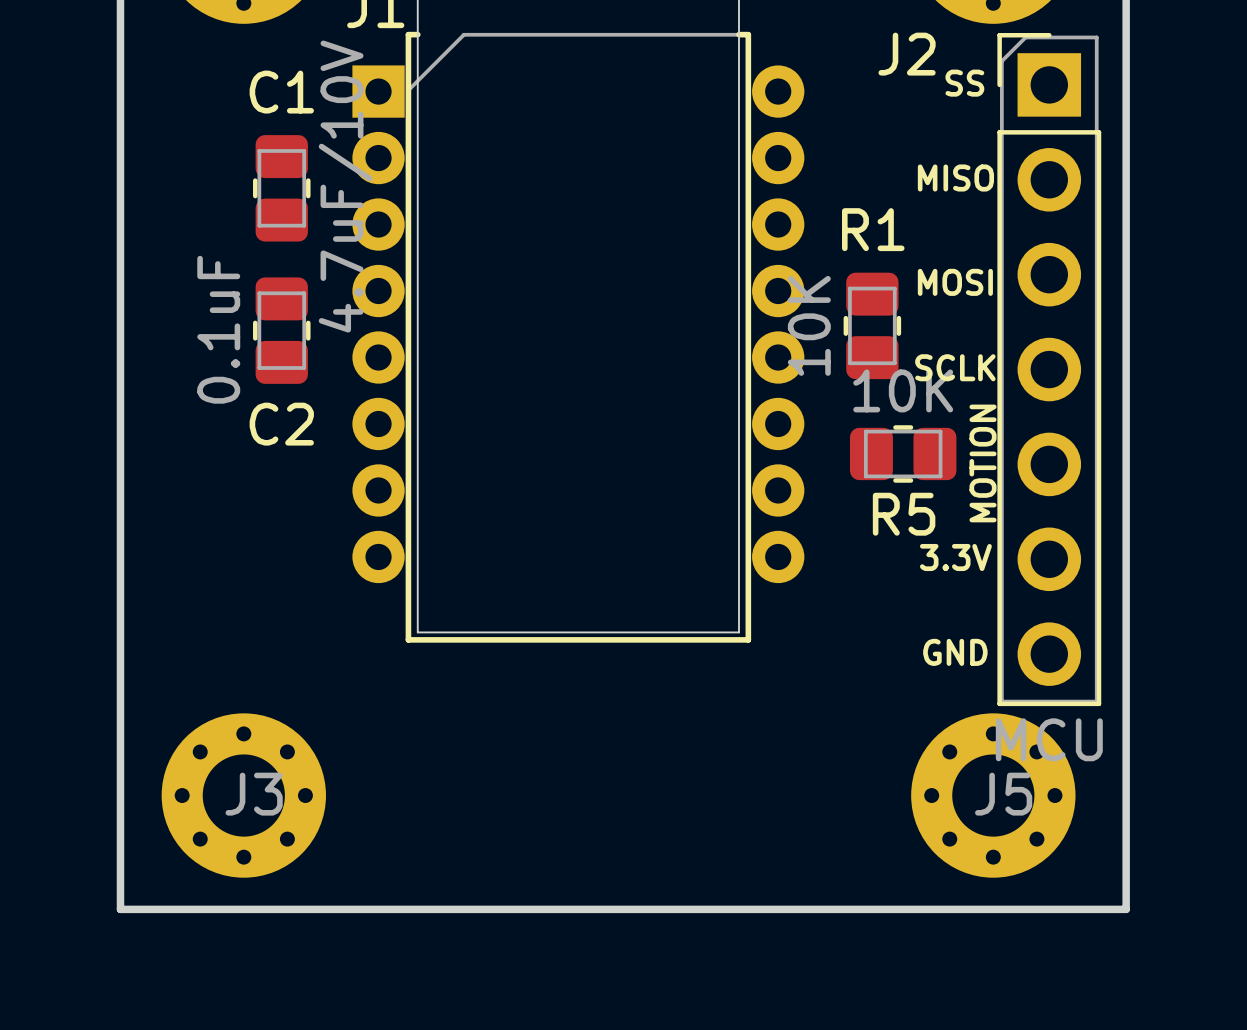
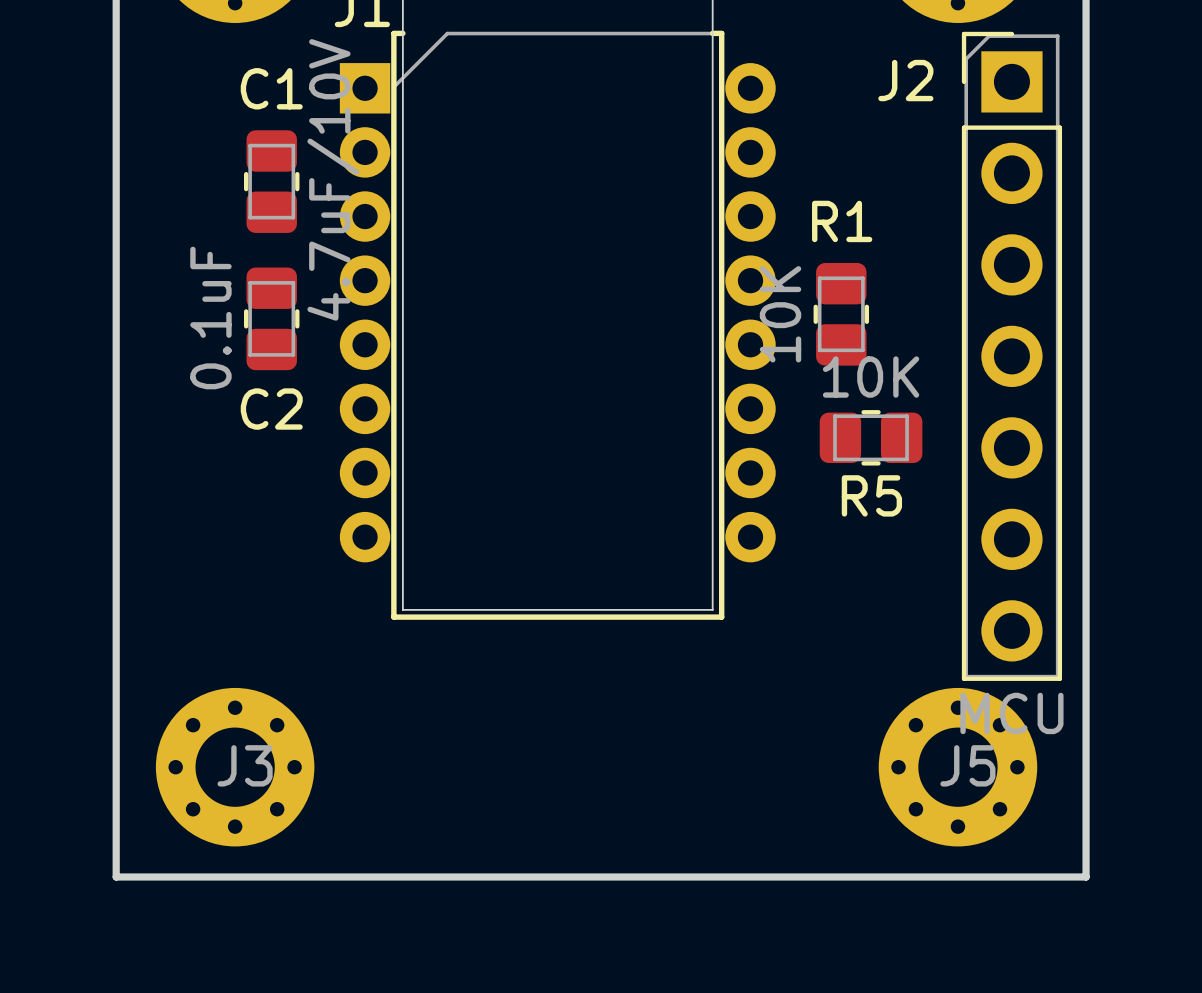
J2 name position: J2 (907, 54) -> J2 (905, 80)
text: SS (964, 83) -> none
text: MISO (955, 178) -> none
text: MOSI (955, 282) -> none
text: SCLK (955, 367) -> none
text: MOTION (983, 463) -> none
text: 3.3V (955, 557) -> none
text: GND (955, 652) -> none

